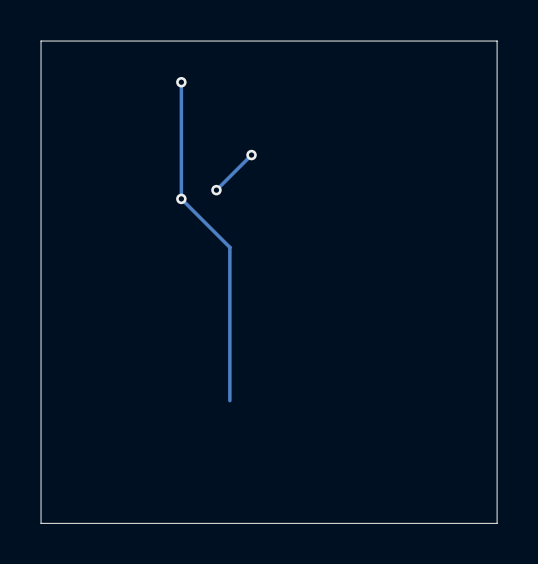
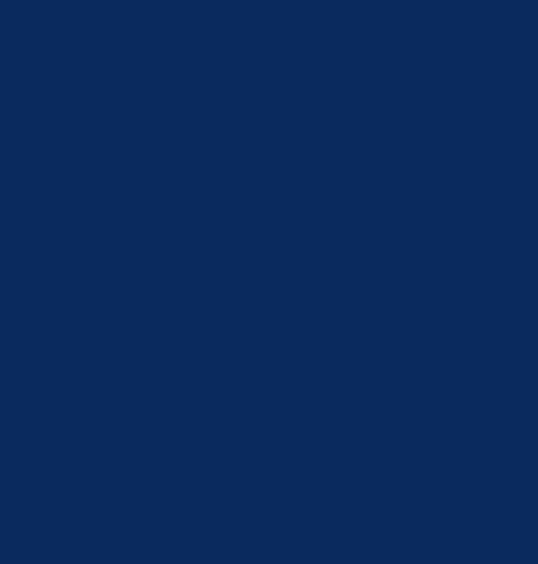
board edge: (497, 41) (41, 41) (41, 523) (497, 523) (497, 41) -> none
track: (181, 82) (181, 198) (229, 247) (229, 400) -> none
via: (181, 82) -> none
track: (251, 155) (216, 190) -> none
via: (251, 155) -> none
via: (216, 190) -> none
via: (181, 198) -> none

